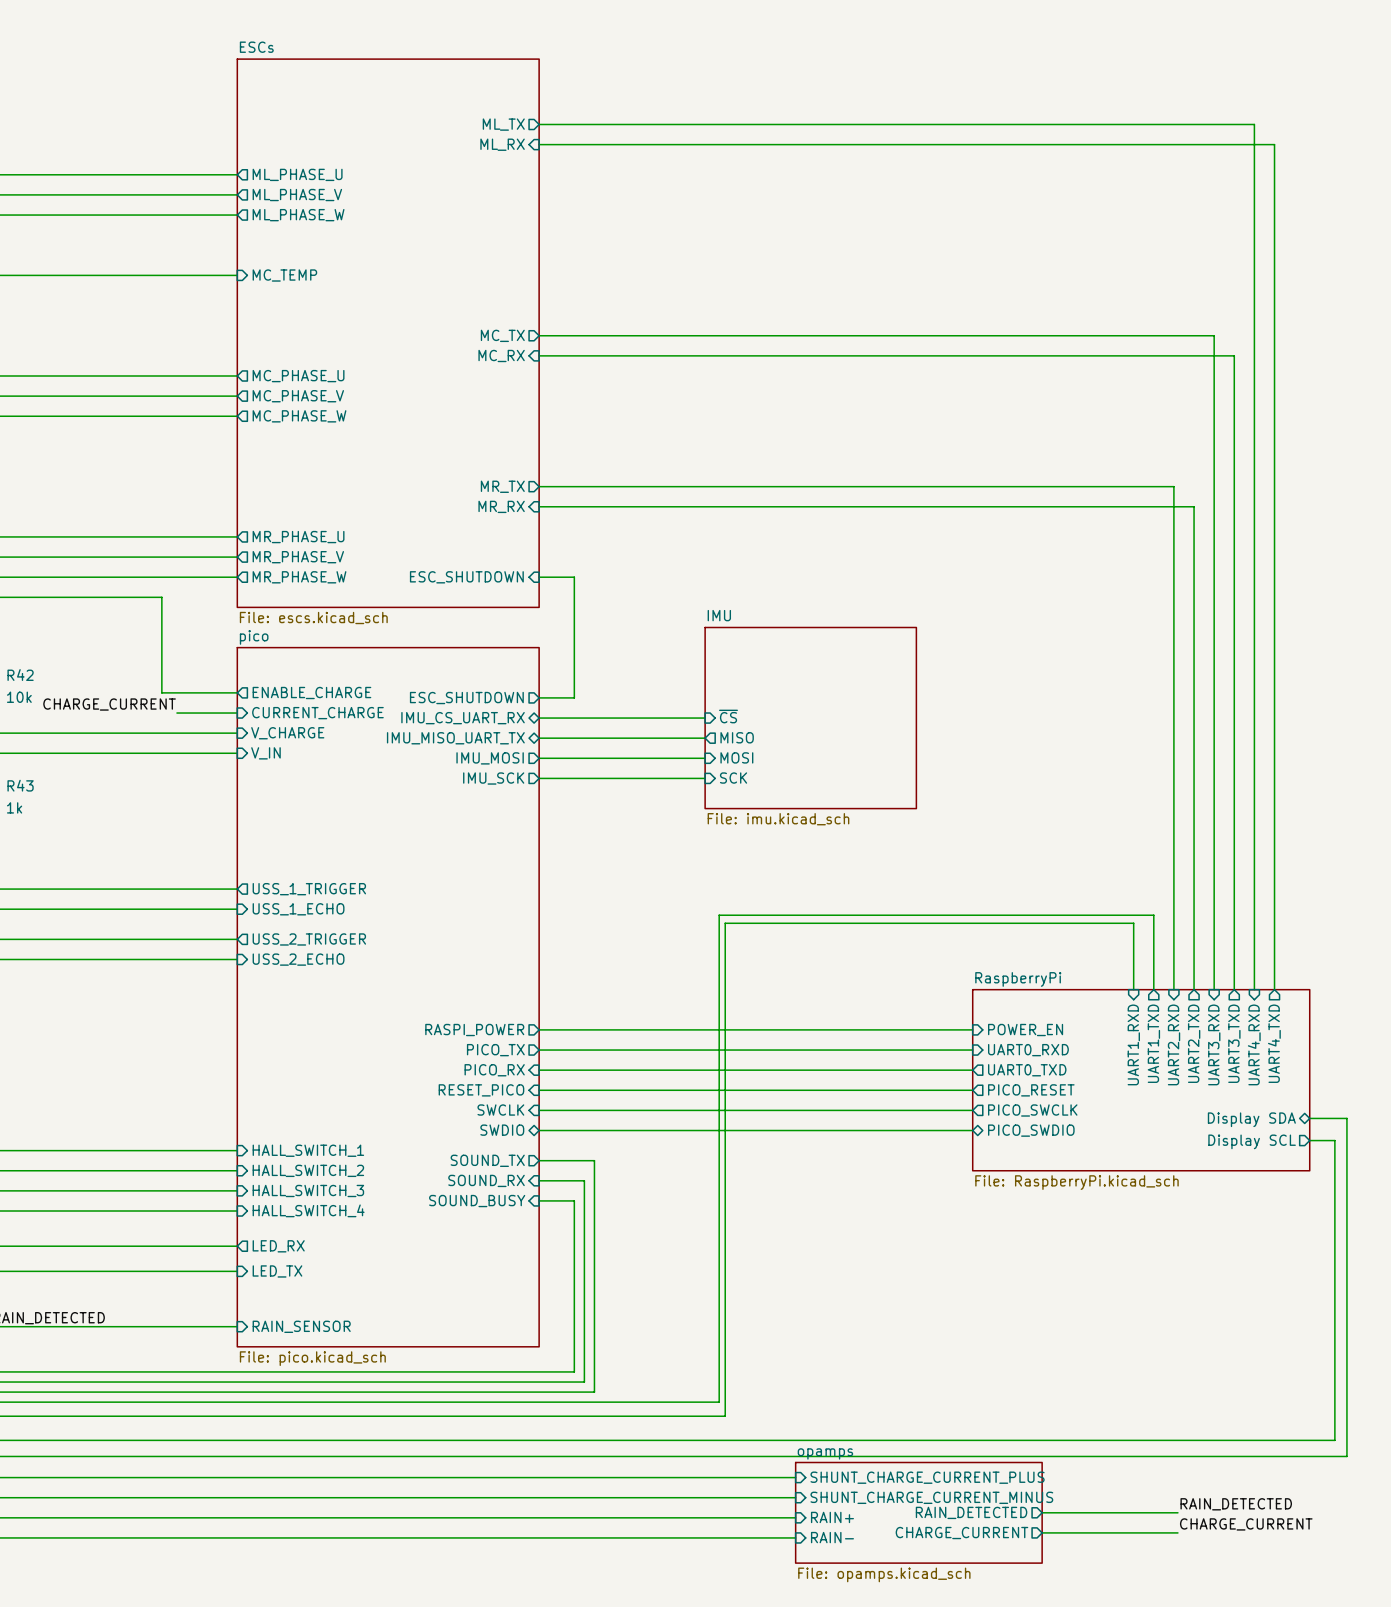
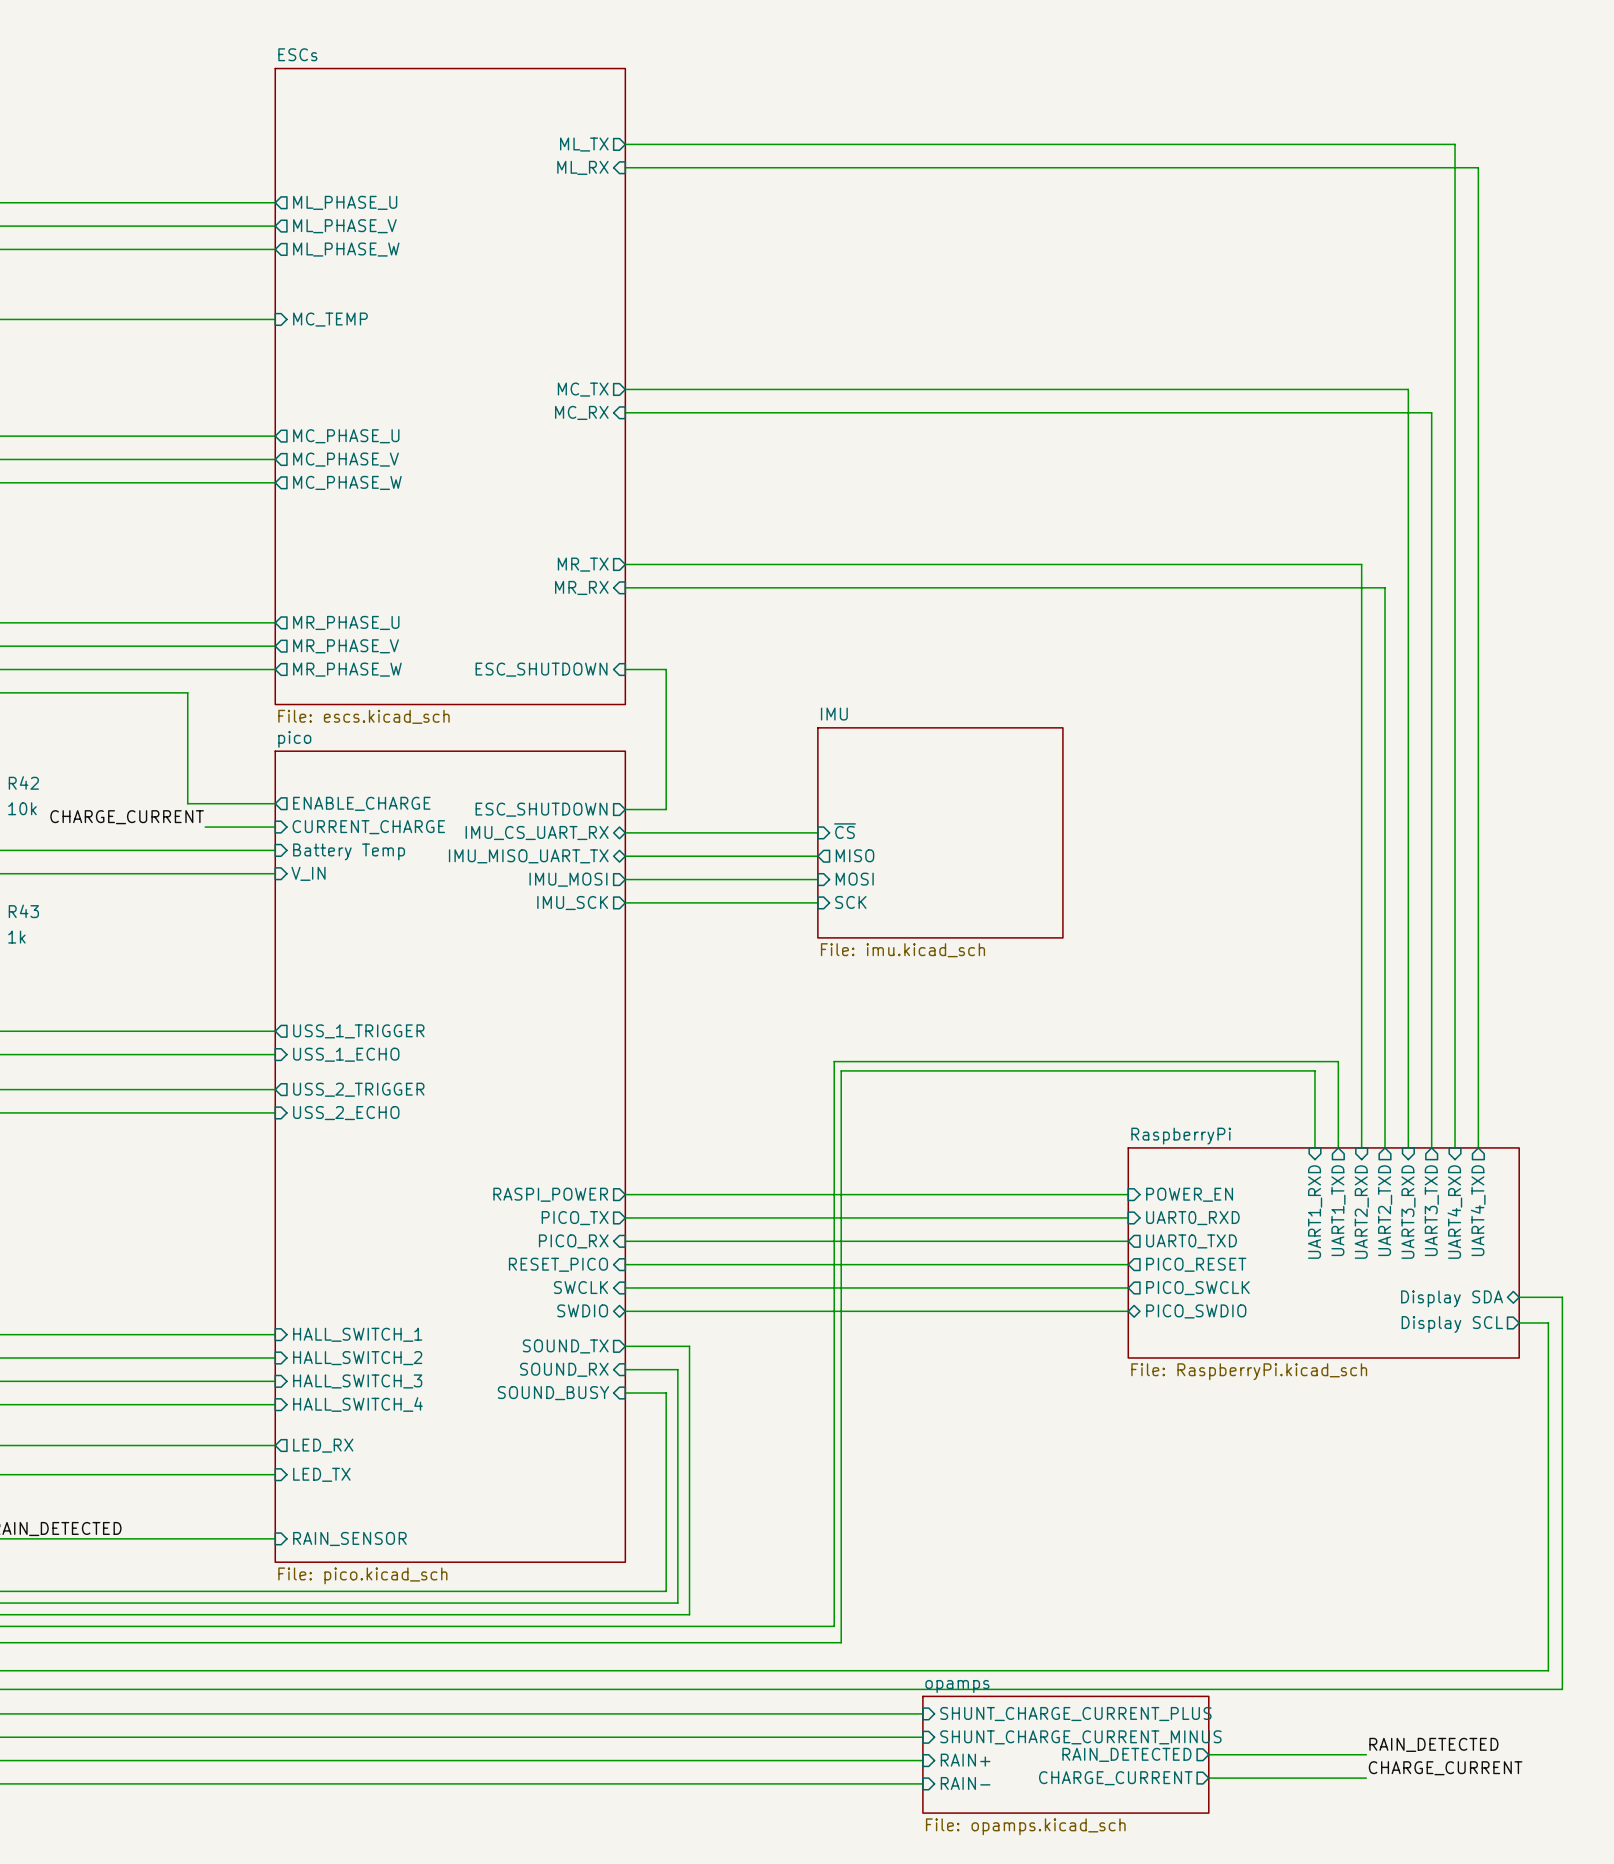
sheet pin: V_CHARGE (287, 733) -> Battery Temp (349, 851)

